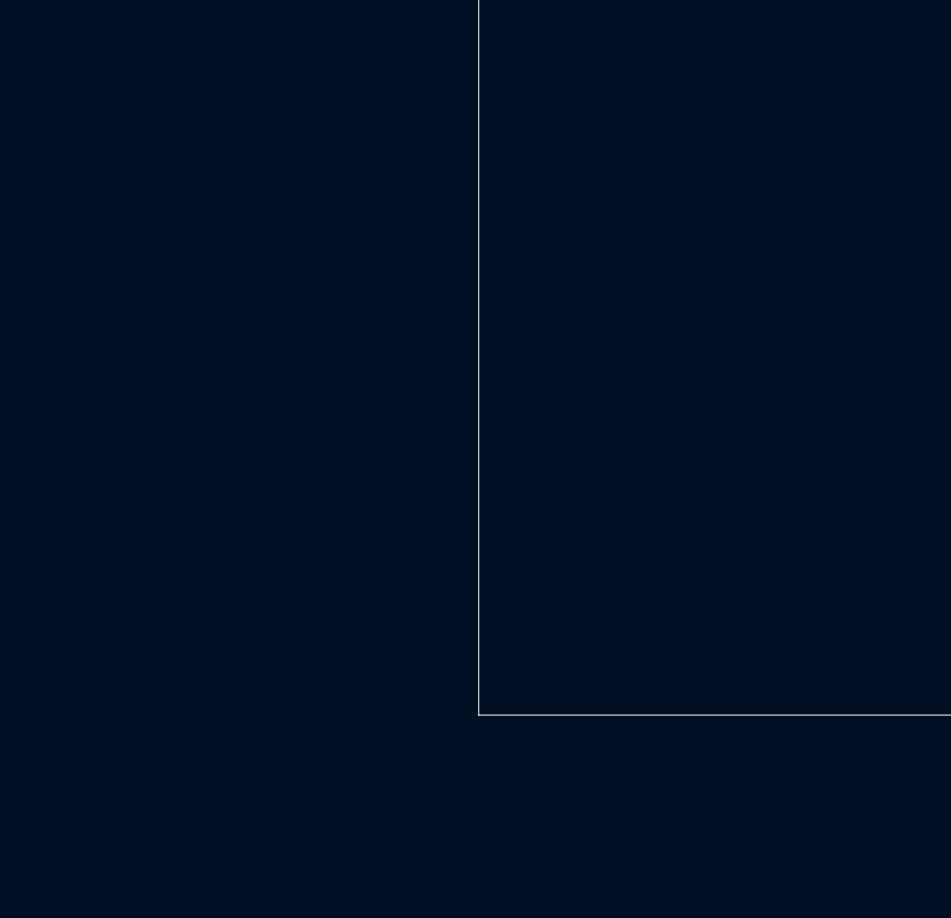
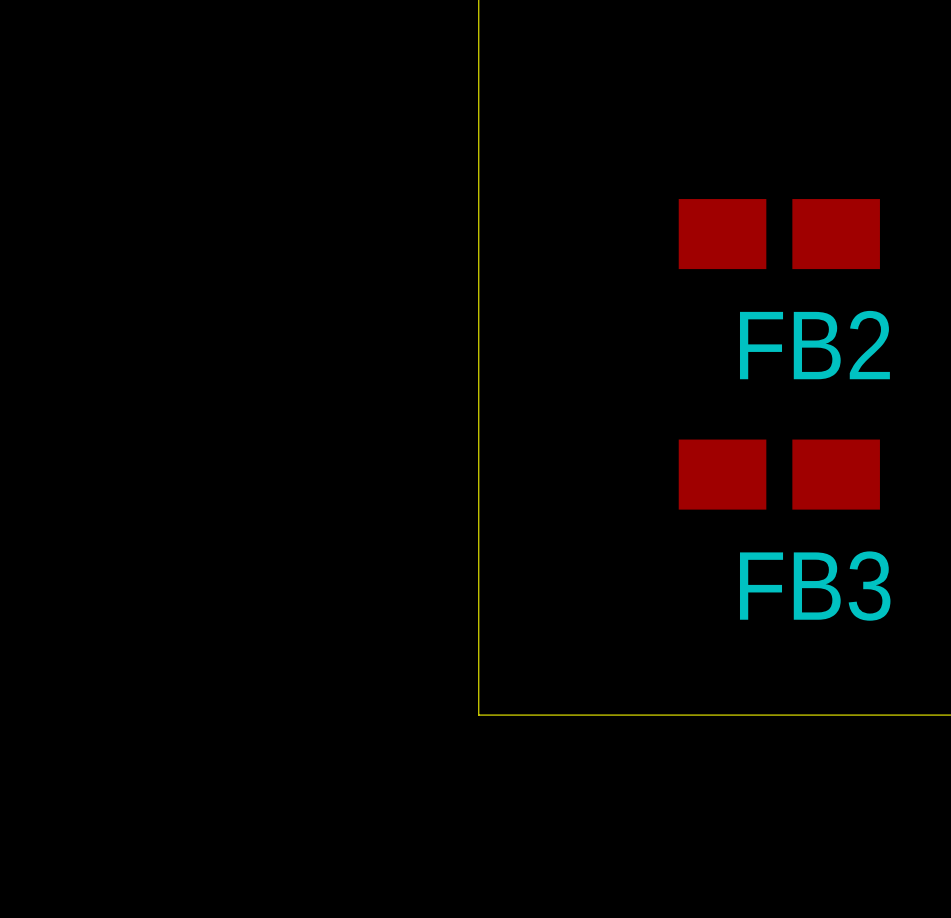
FB2: none -> (779, 234)
FB3: none -> (779, 474)

